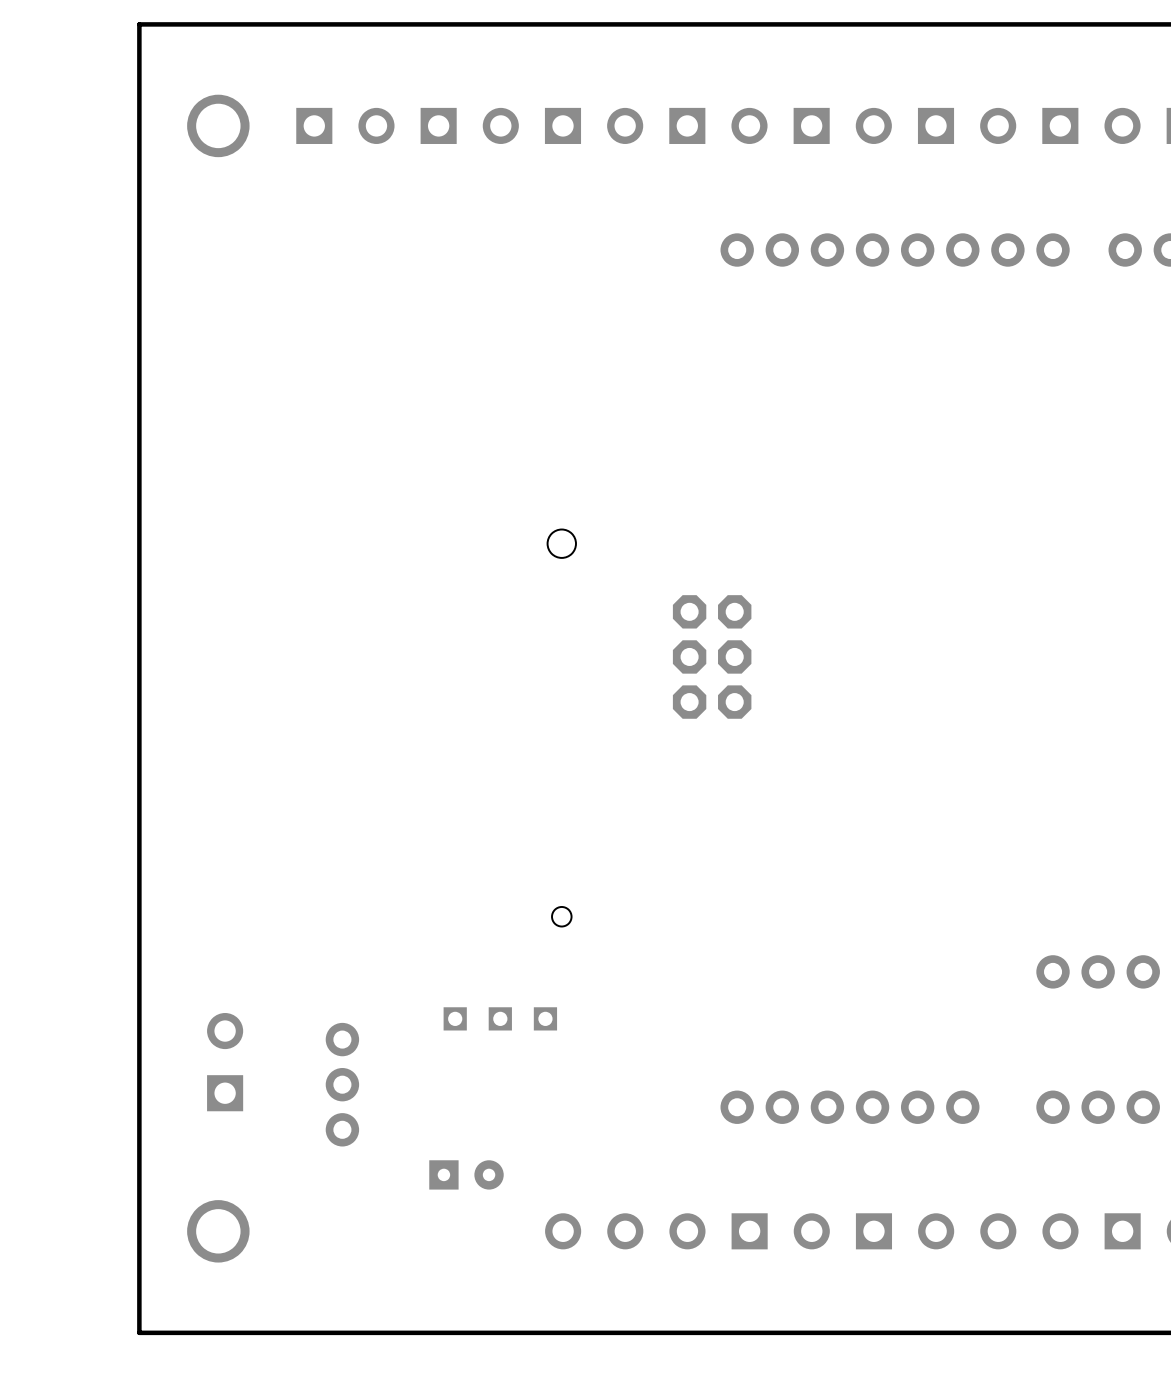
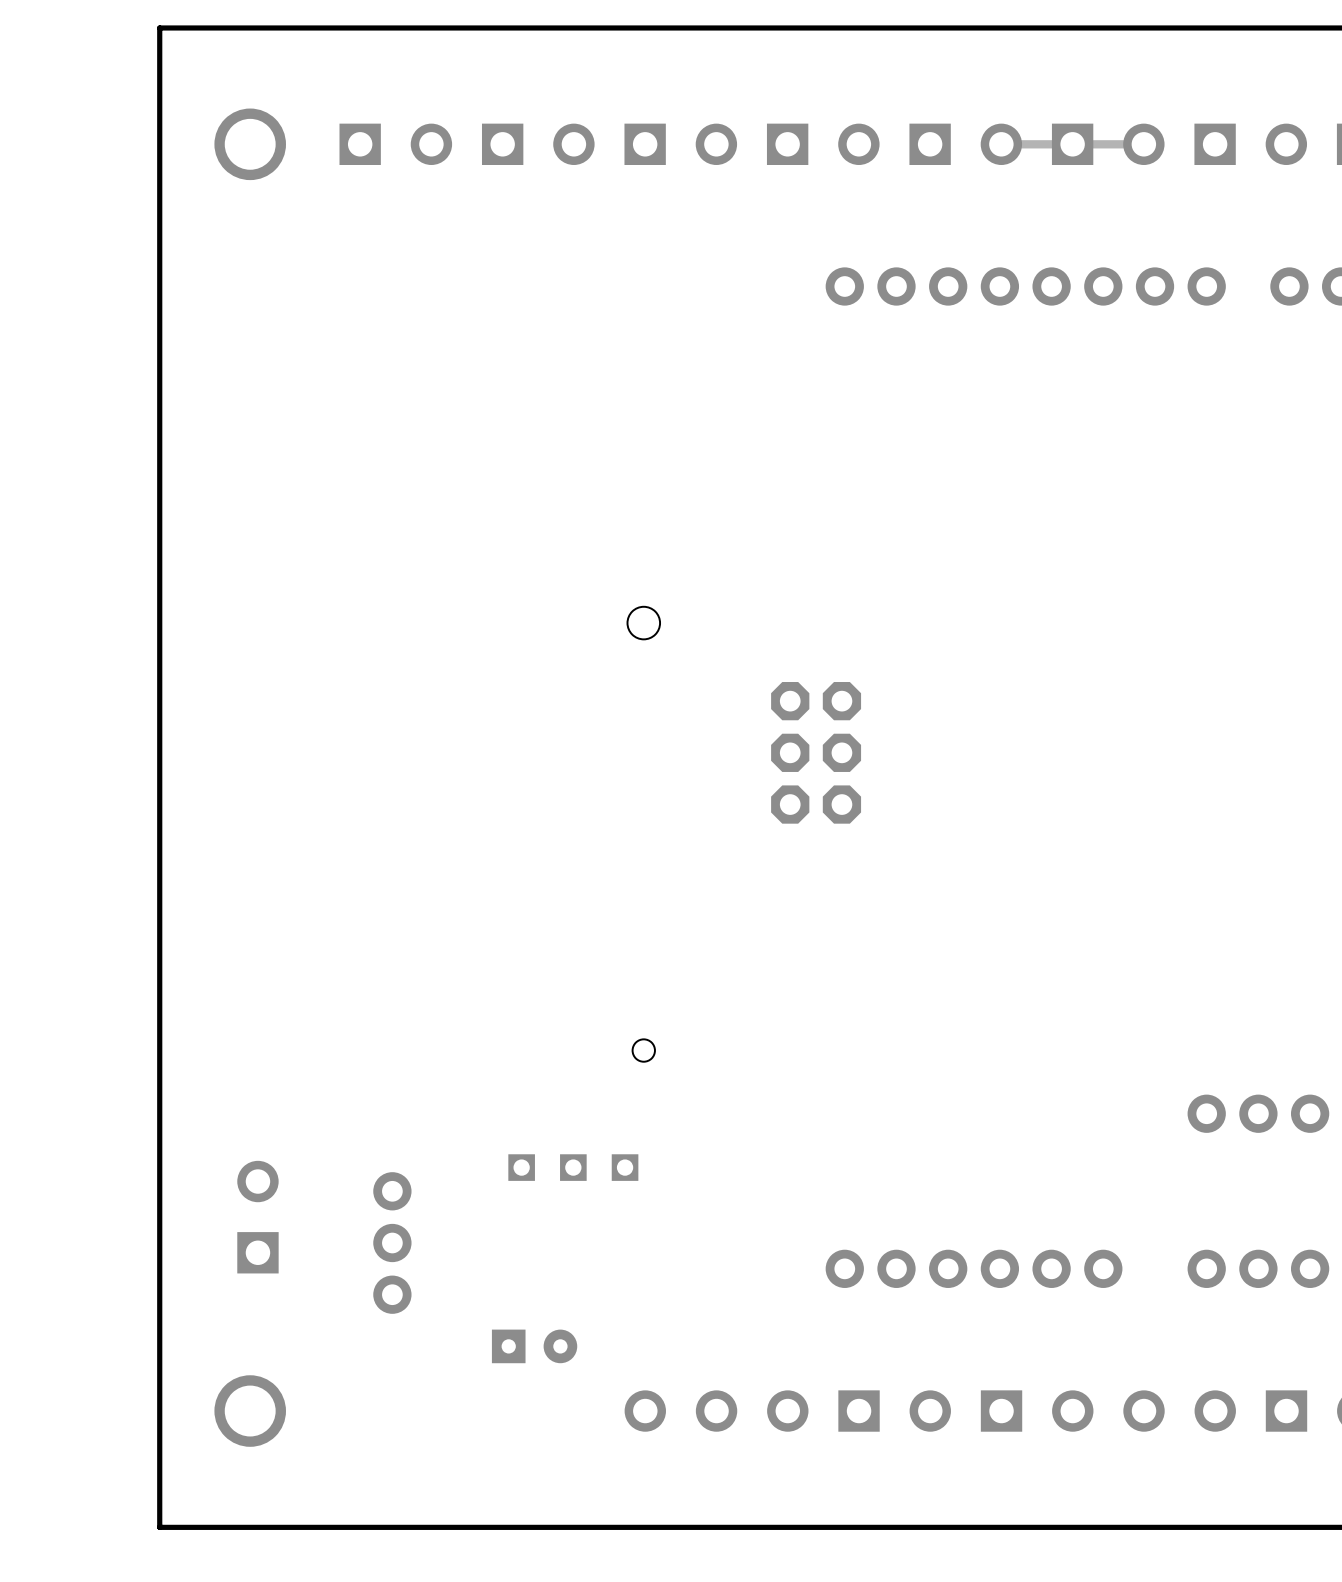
track: none -> (1143, 144) (1001, 144)

